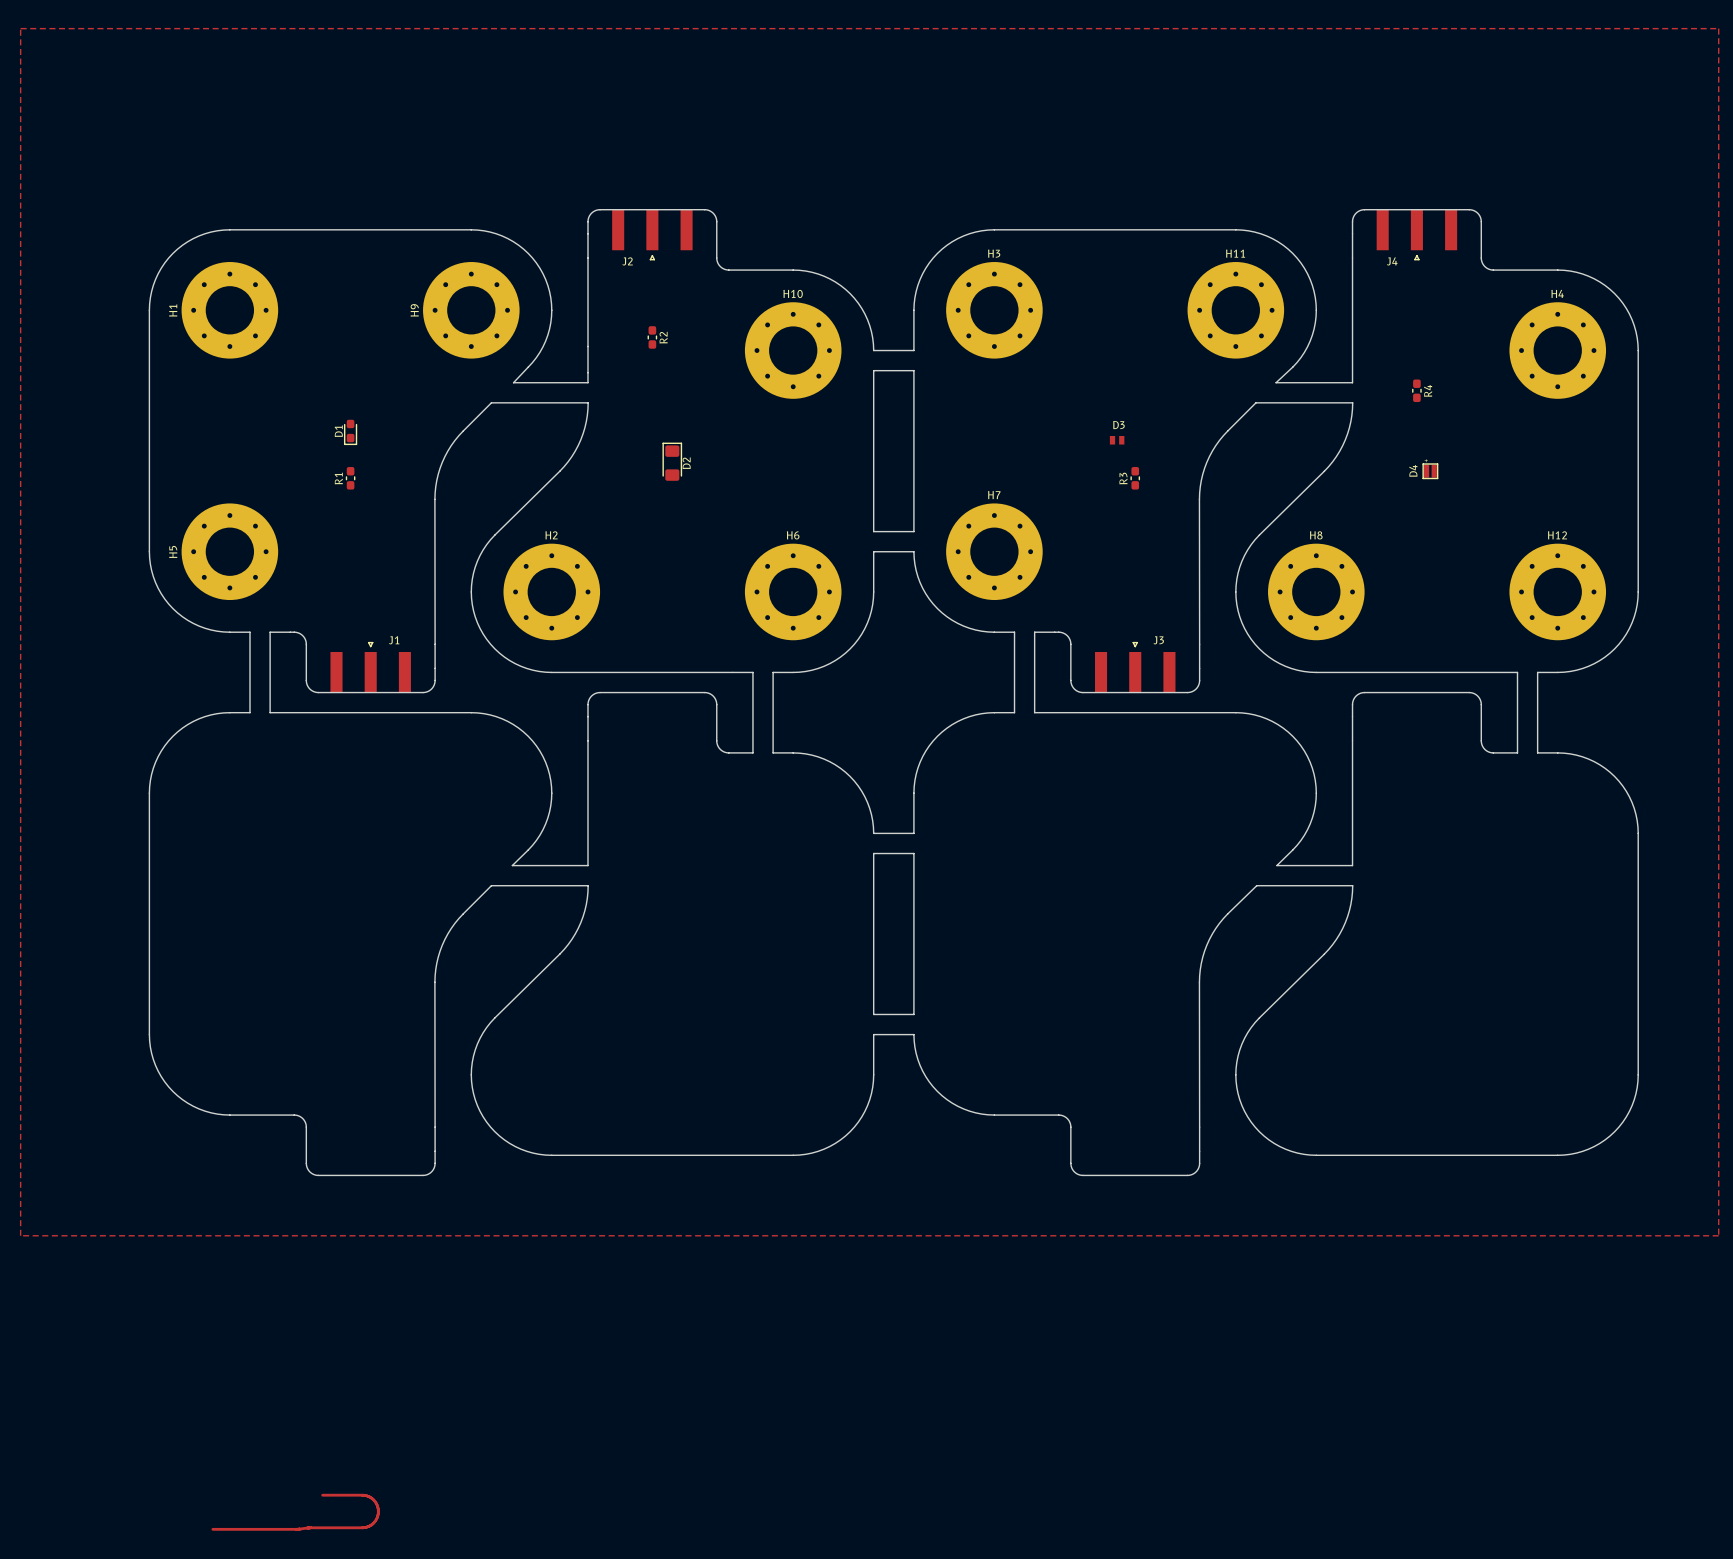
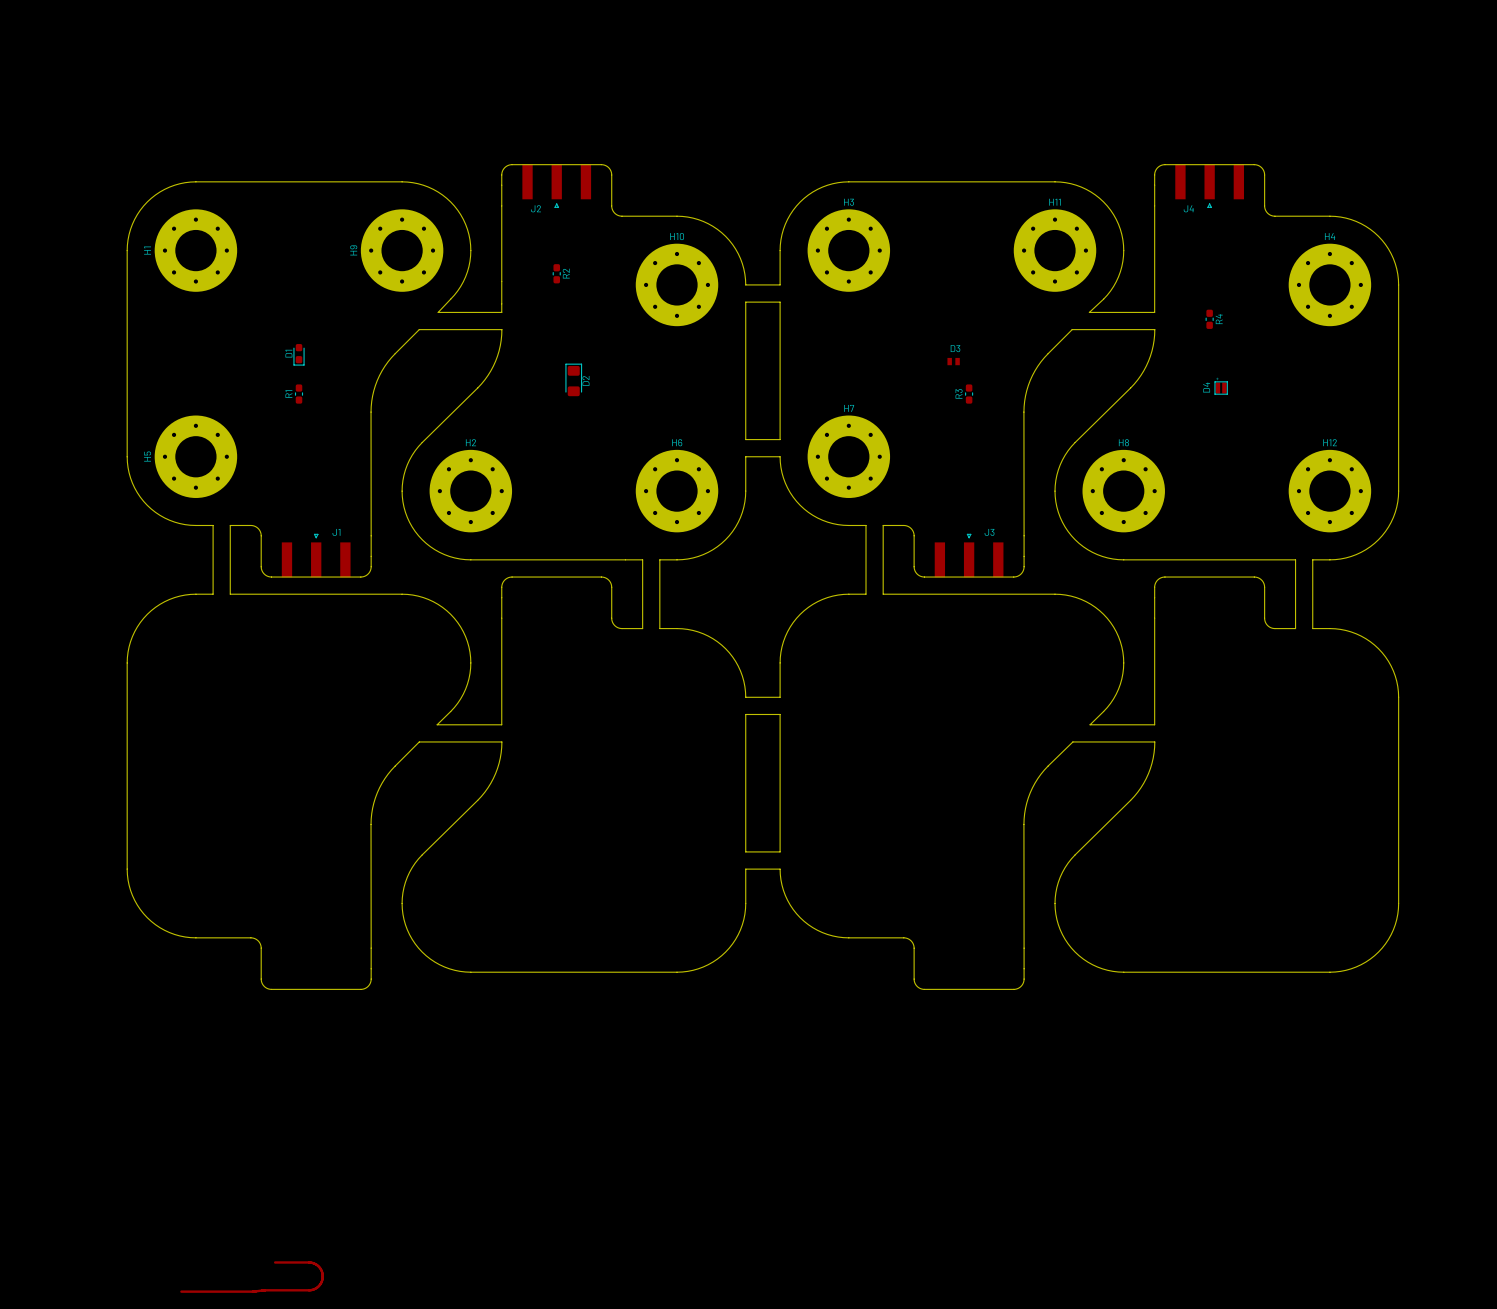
zone outline: (20, 28) (20, 1235) (1718, 1235) (1718, 28) (20, 28) -> none

